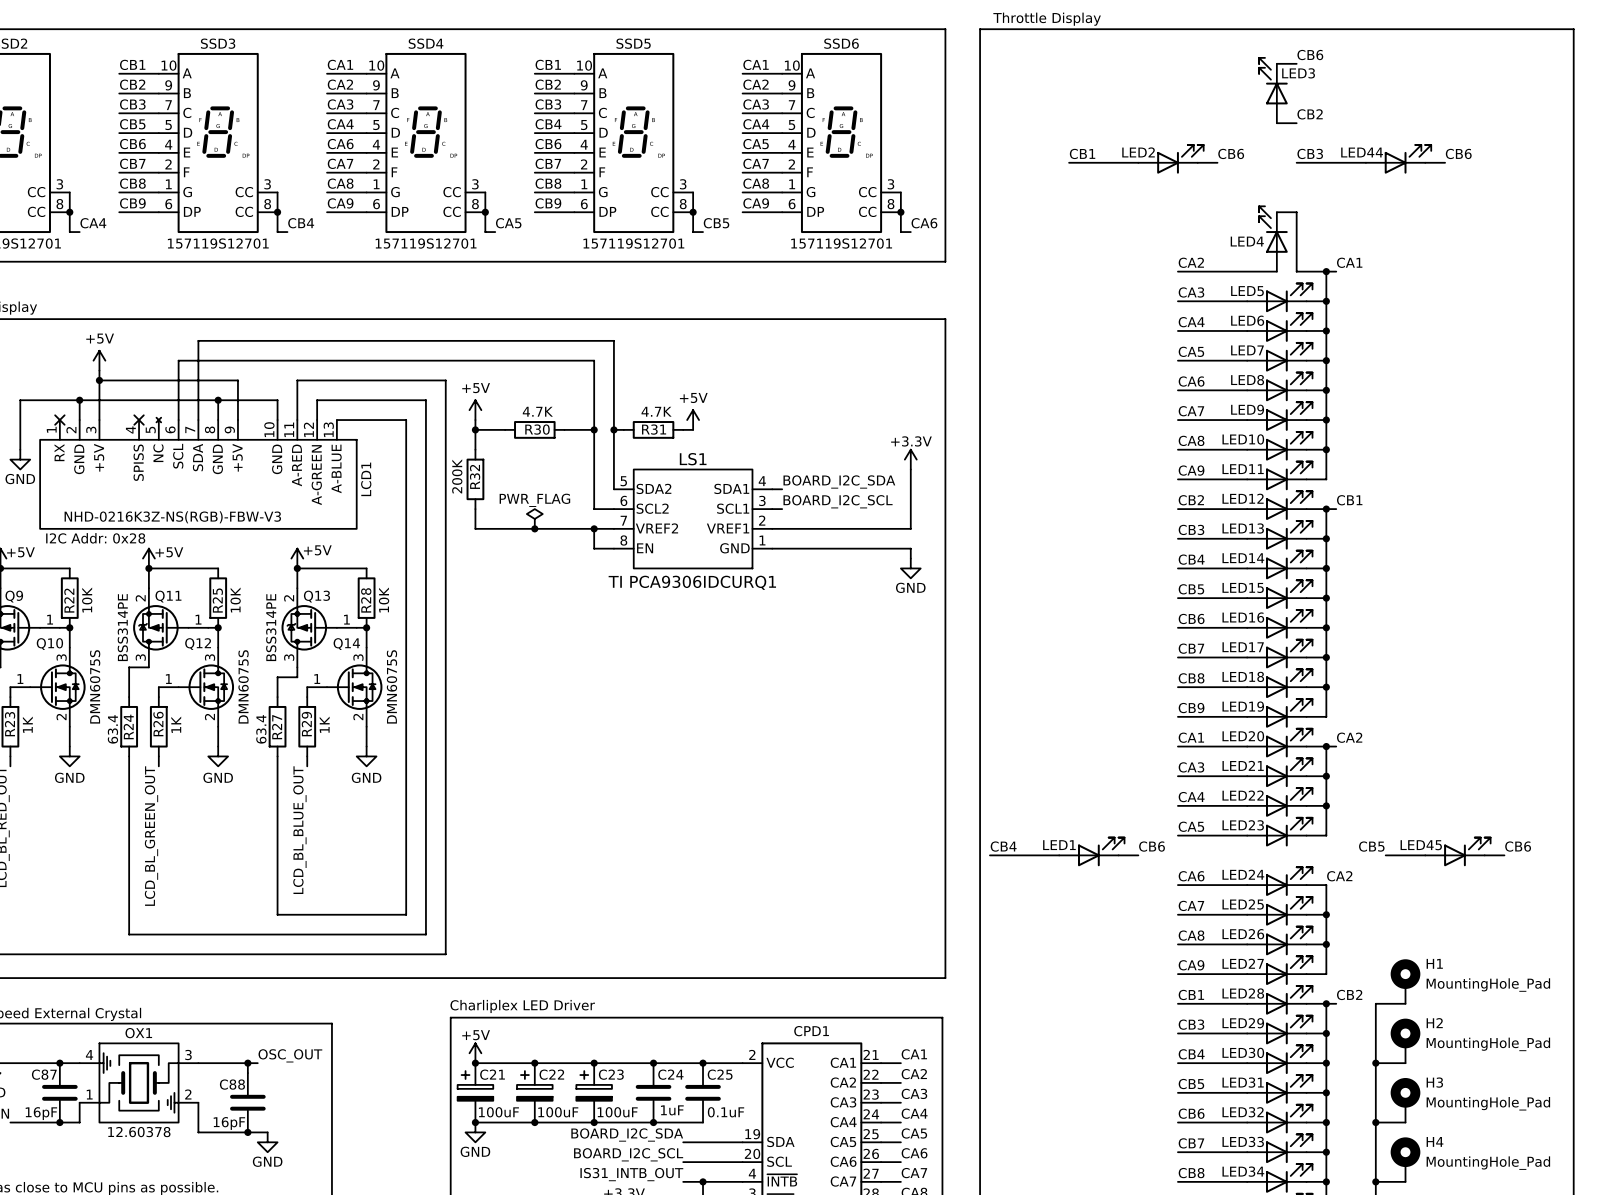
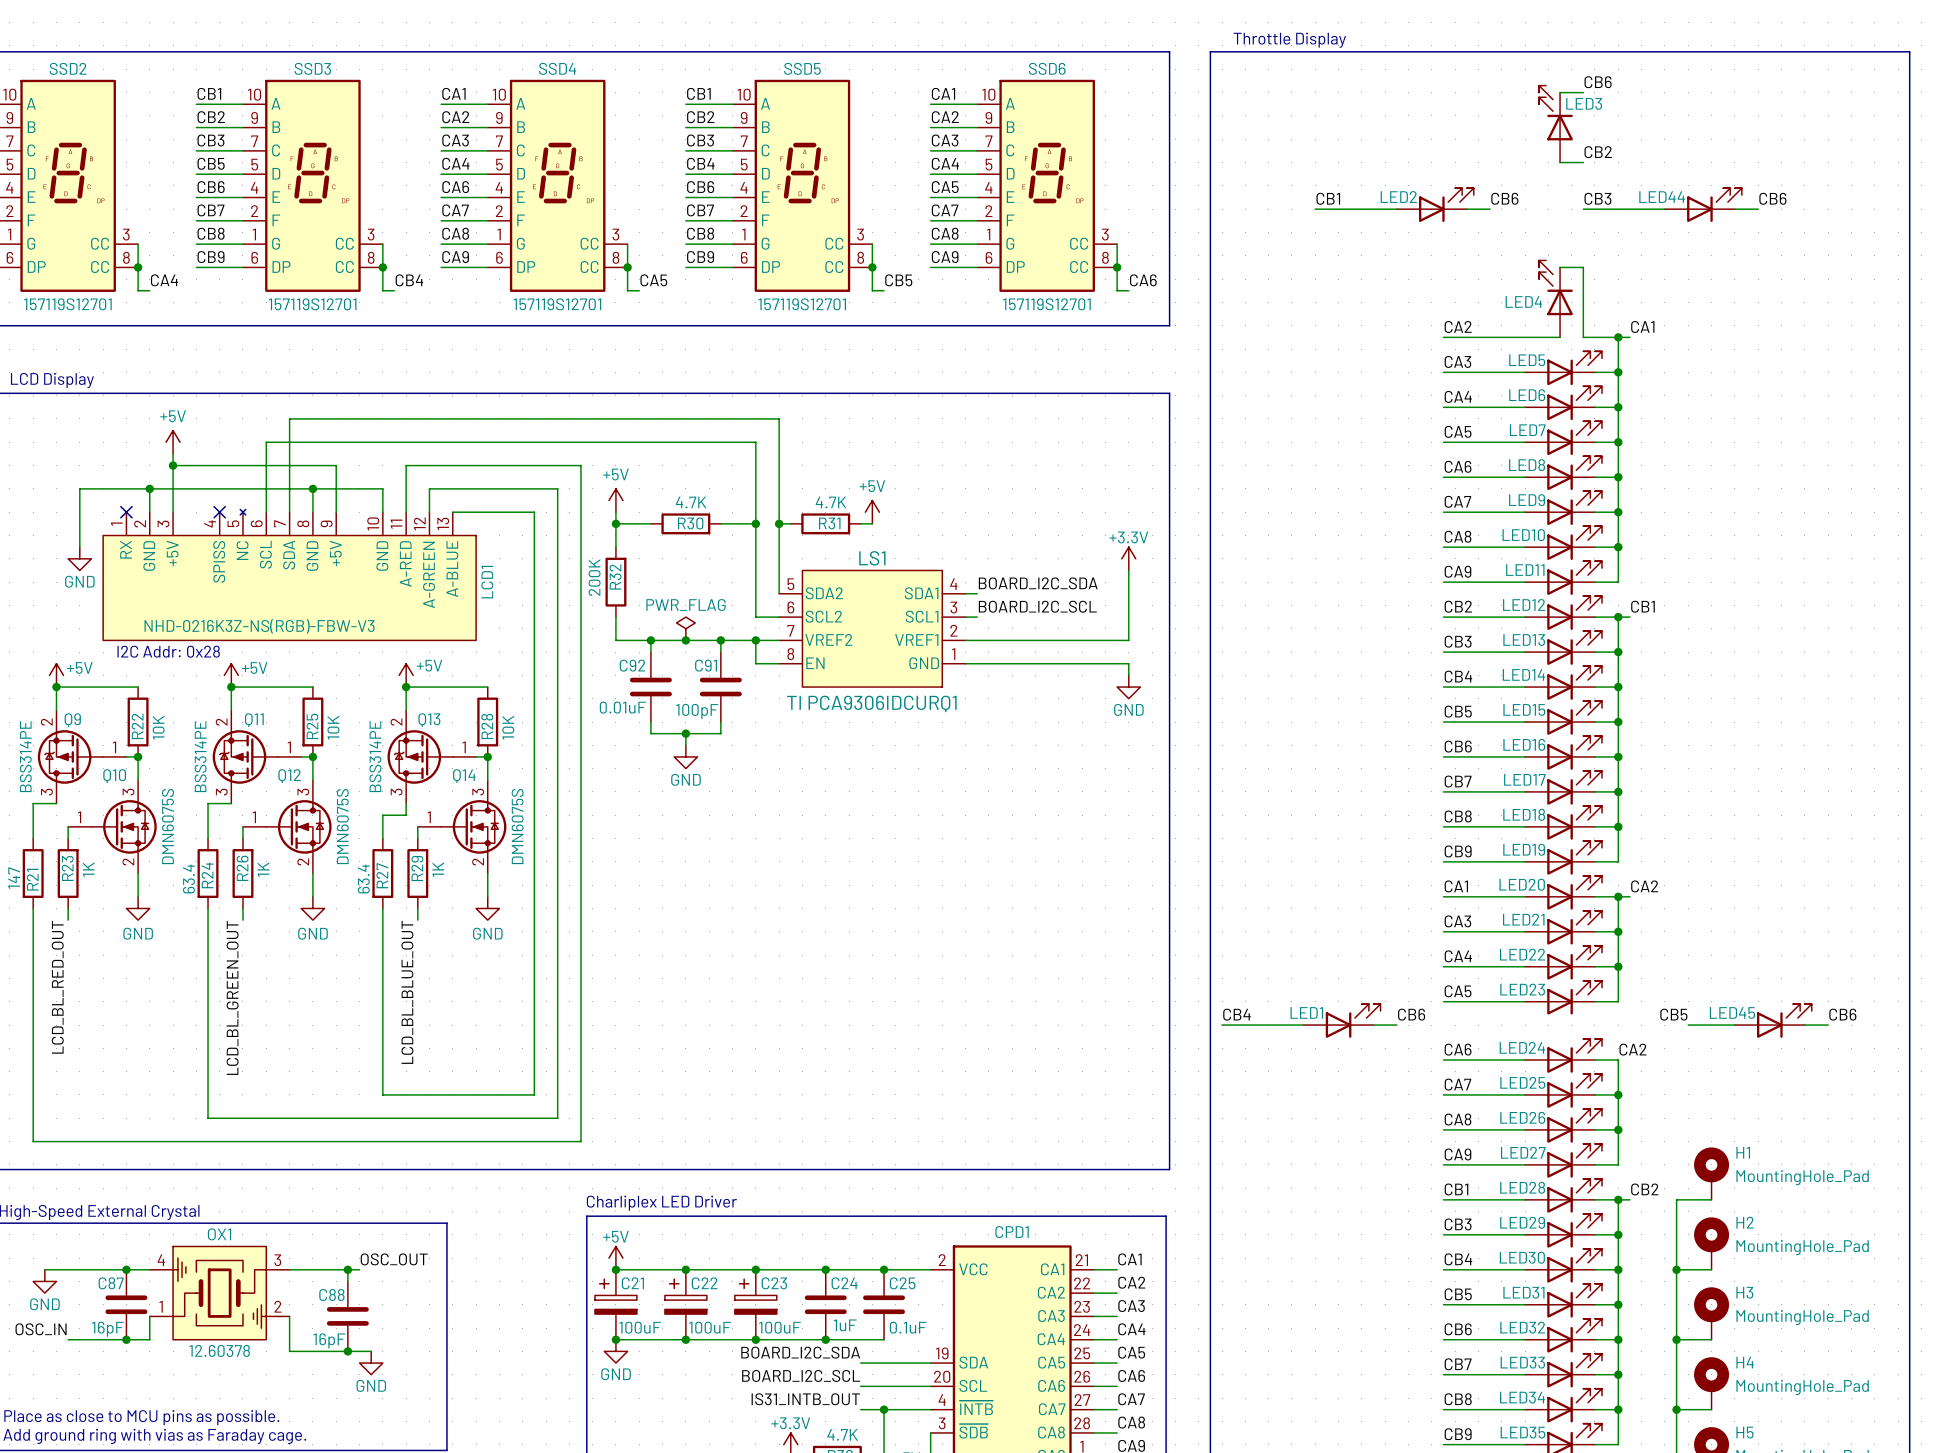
wire: none -> (650, 640) (650, 652)
junction: none -> (650, 640)
wire: none -> (720, 640) (720, 652)
junction: none -> (720, 640)
C92: none -> 0.01uF (650, 687)
C91: none -> 100pF (720, 687)
wire: none -> (650, 722) (650, 733) (720, 733) (720, 722)
wire: none -> (685, 733) (685, 745)
junction: none -> (685, 733)
power symbol: none -> GND (685, 756)

